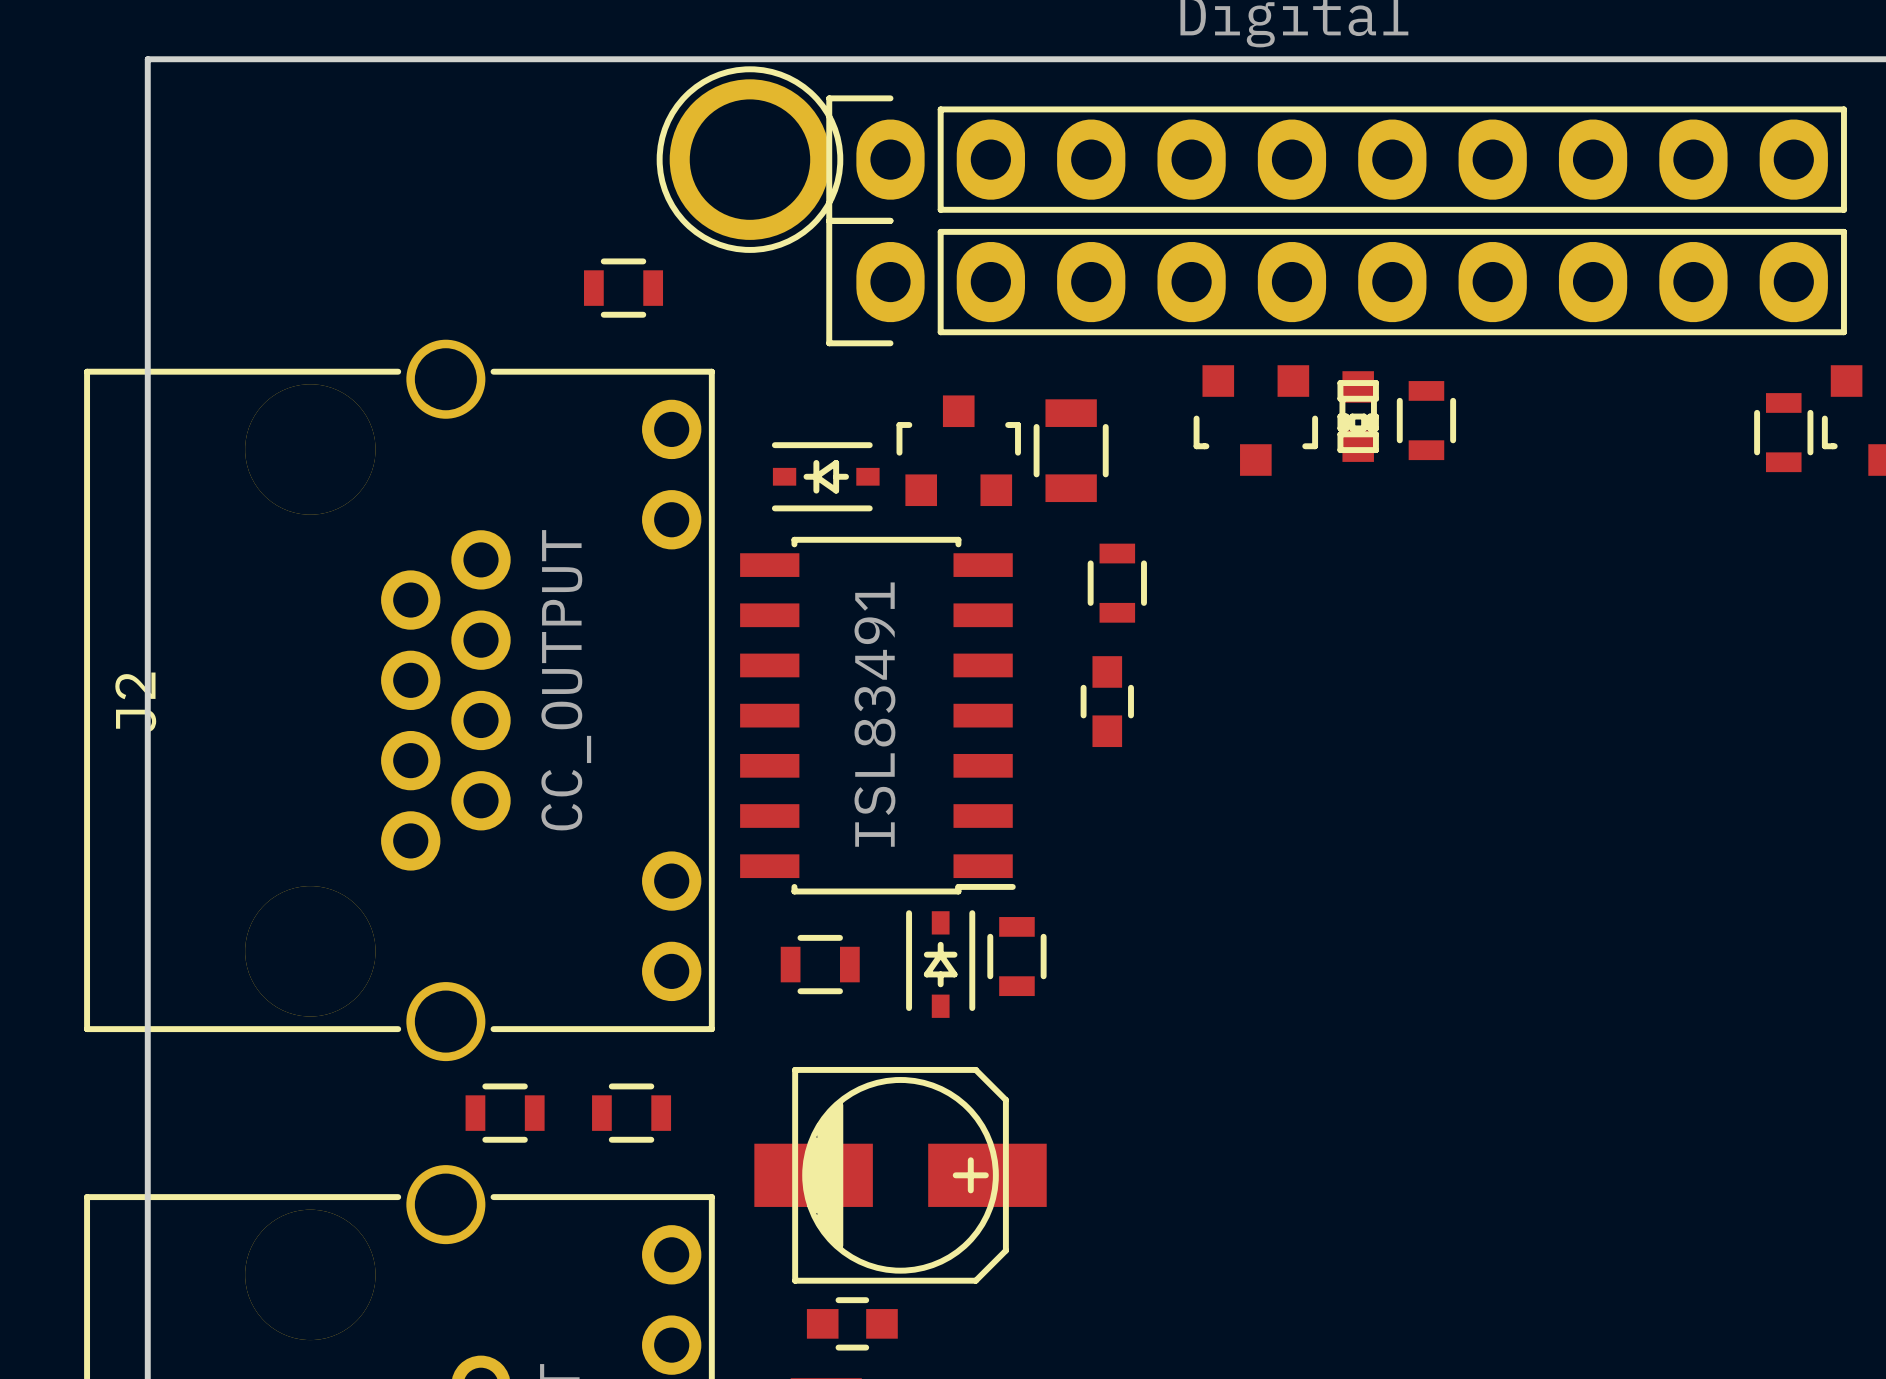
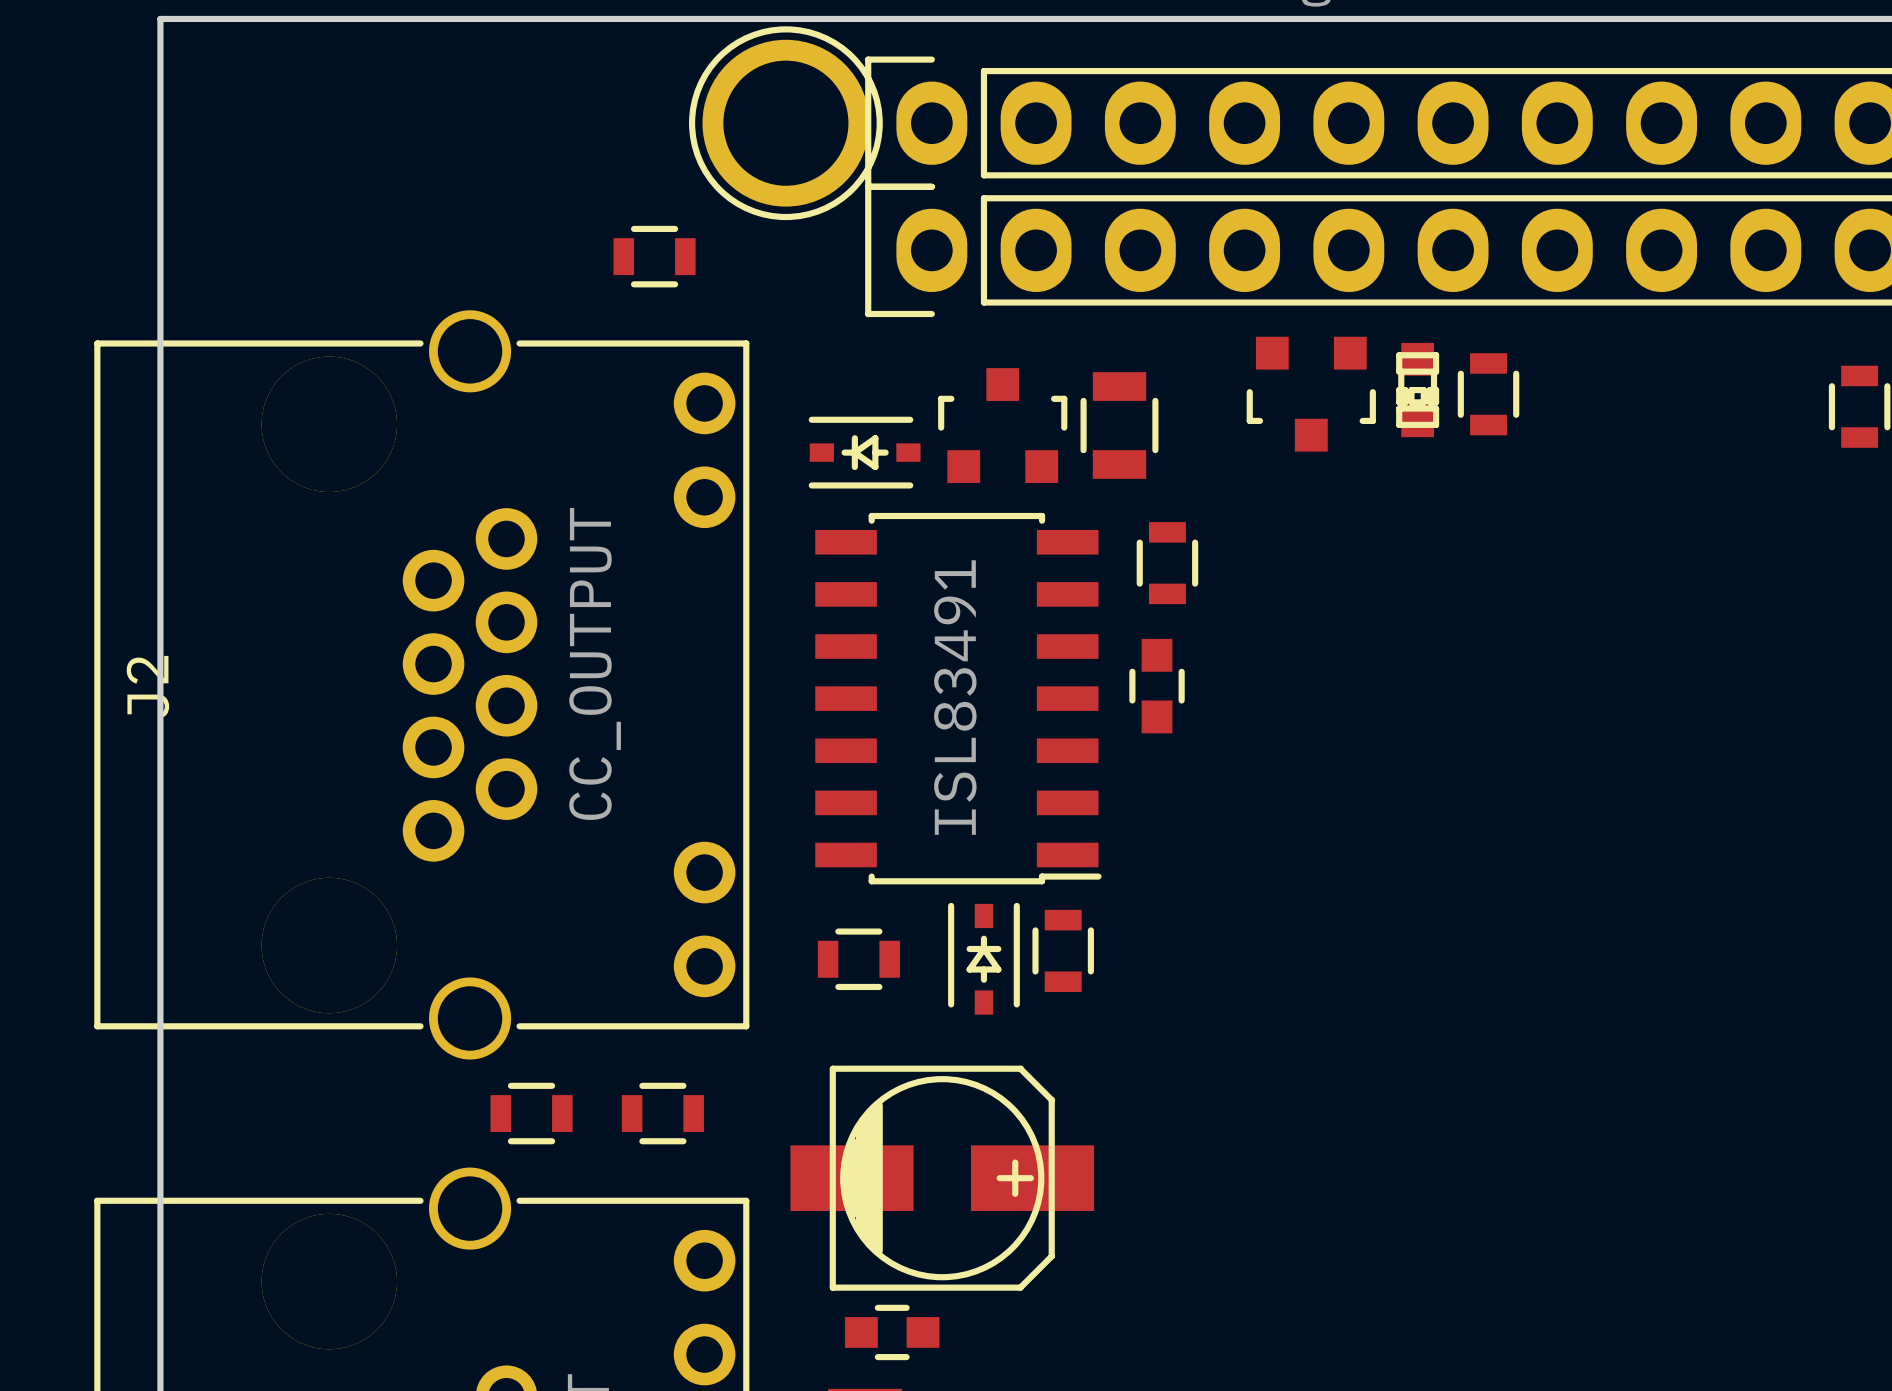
part position: (877, 715) -> (958, 698)

